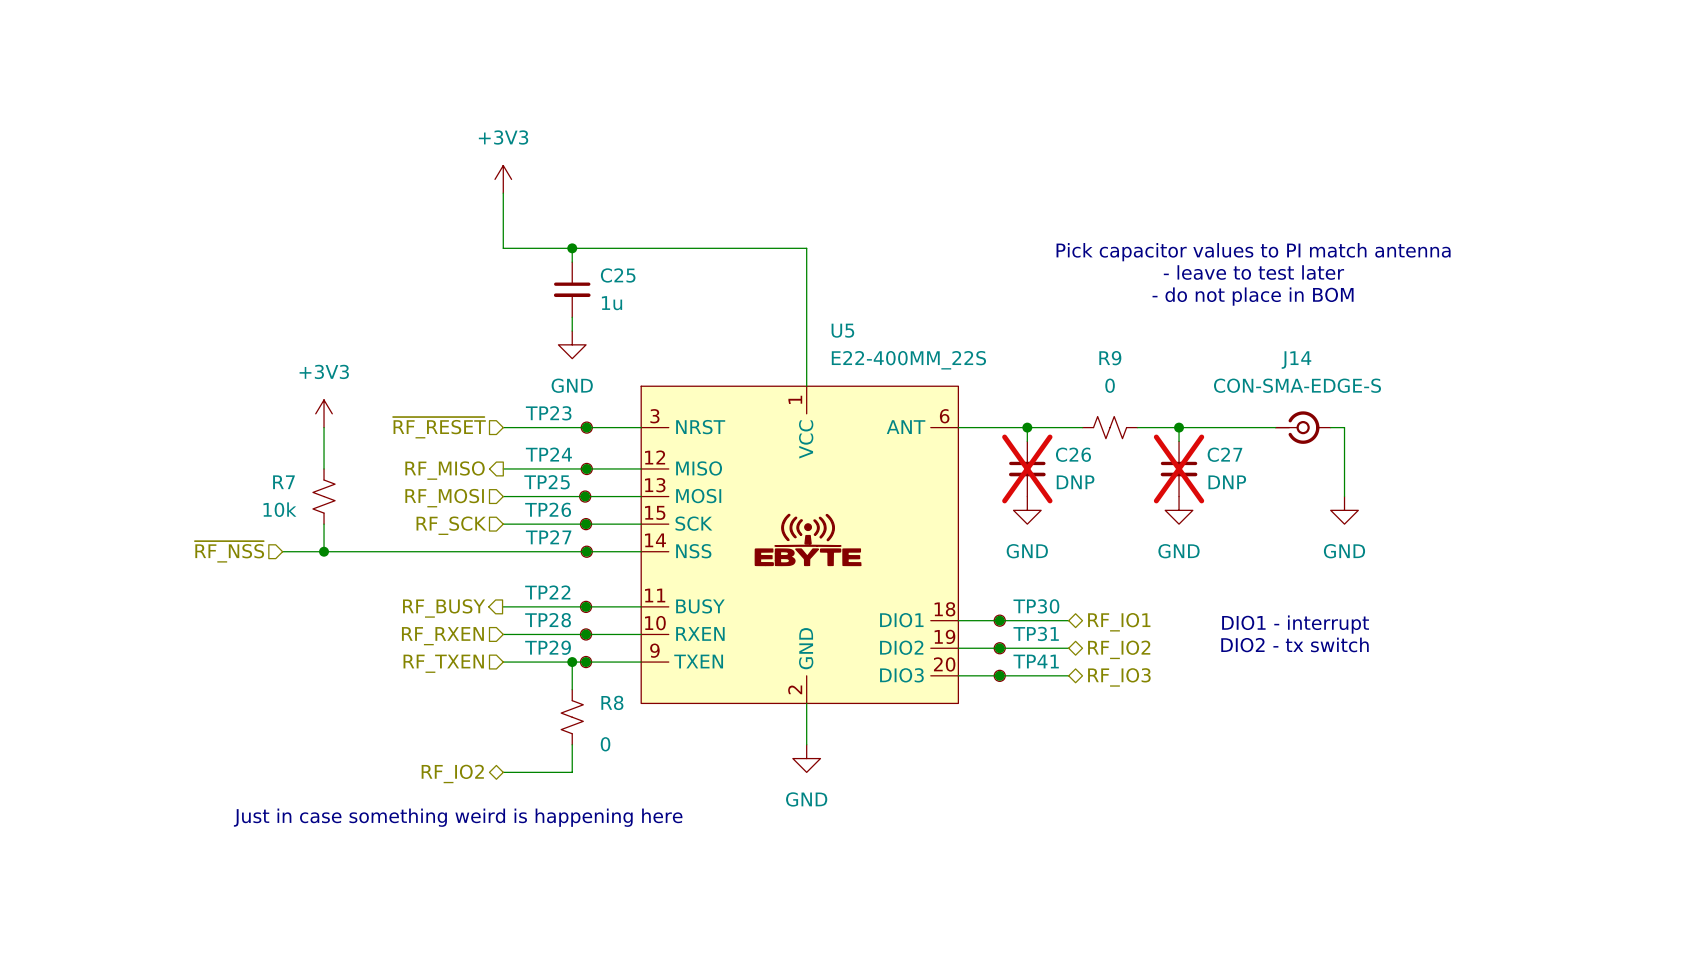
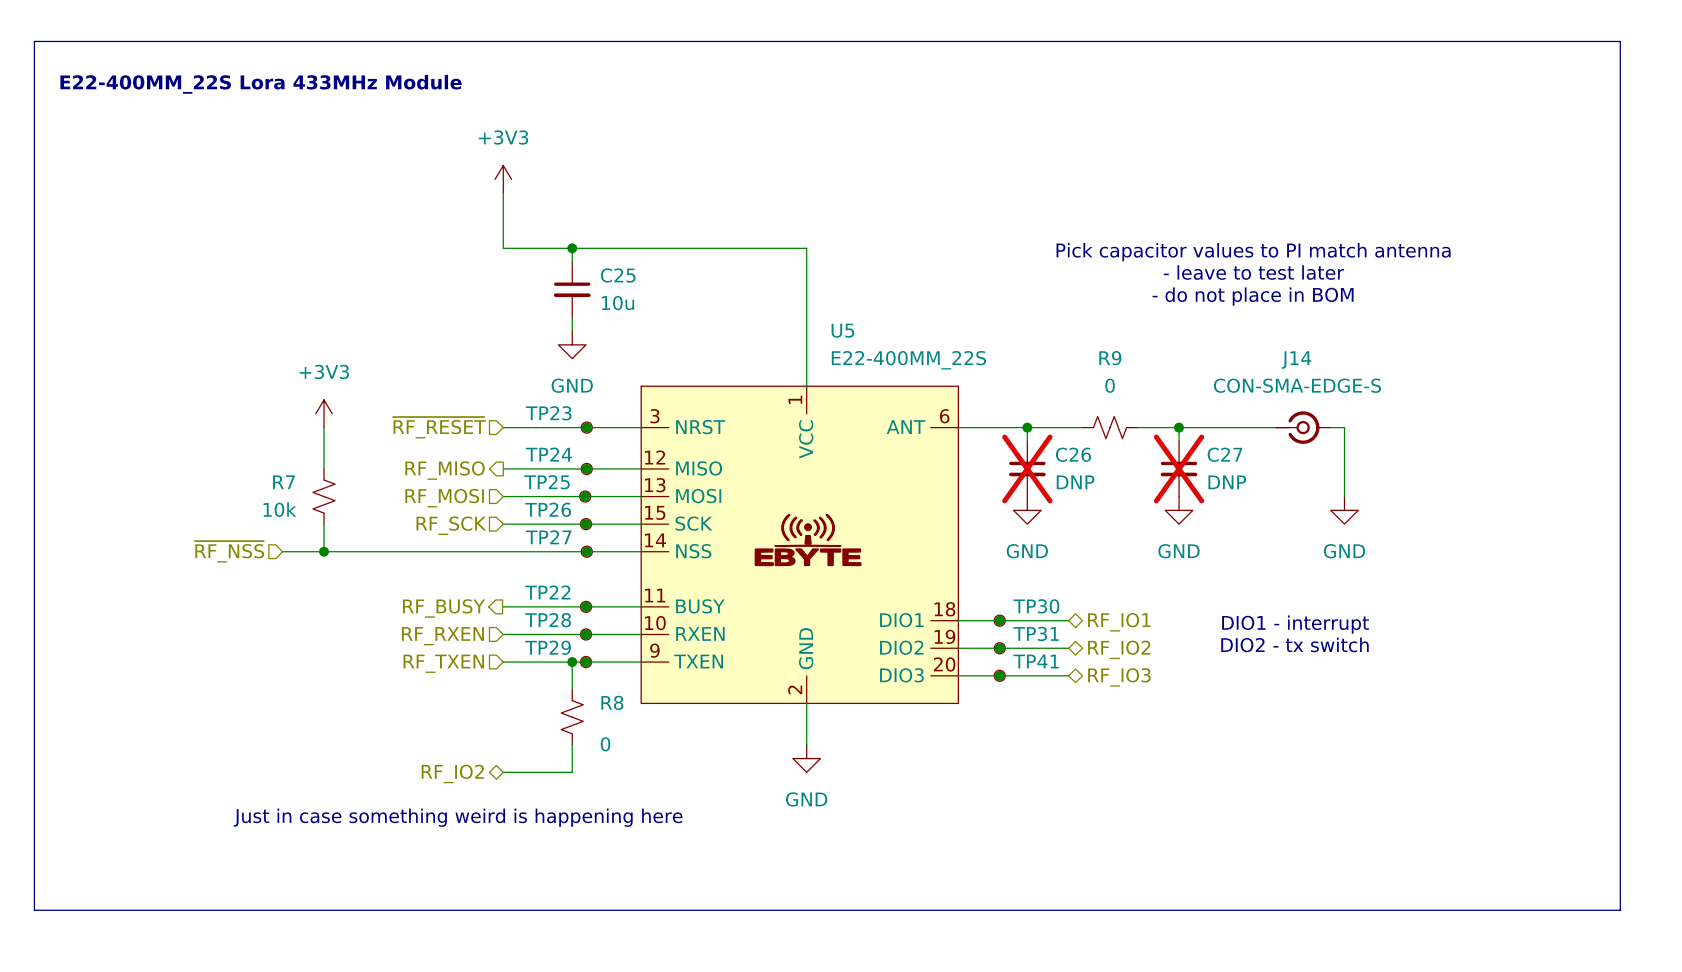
line: none -> (34, 41) (1620, 41) (1620, 910) (34, 910) (34, 41)
text: none -> E22-400MM_22S Lora 433MHz Module (260, 84)
C25 value: 1u (612, 303) -> 10u (618, 303)

